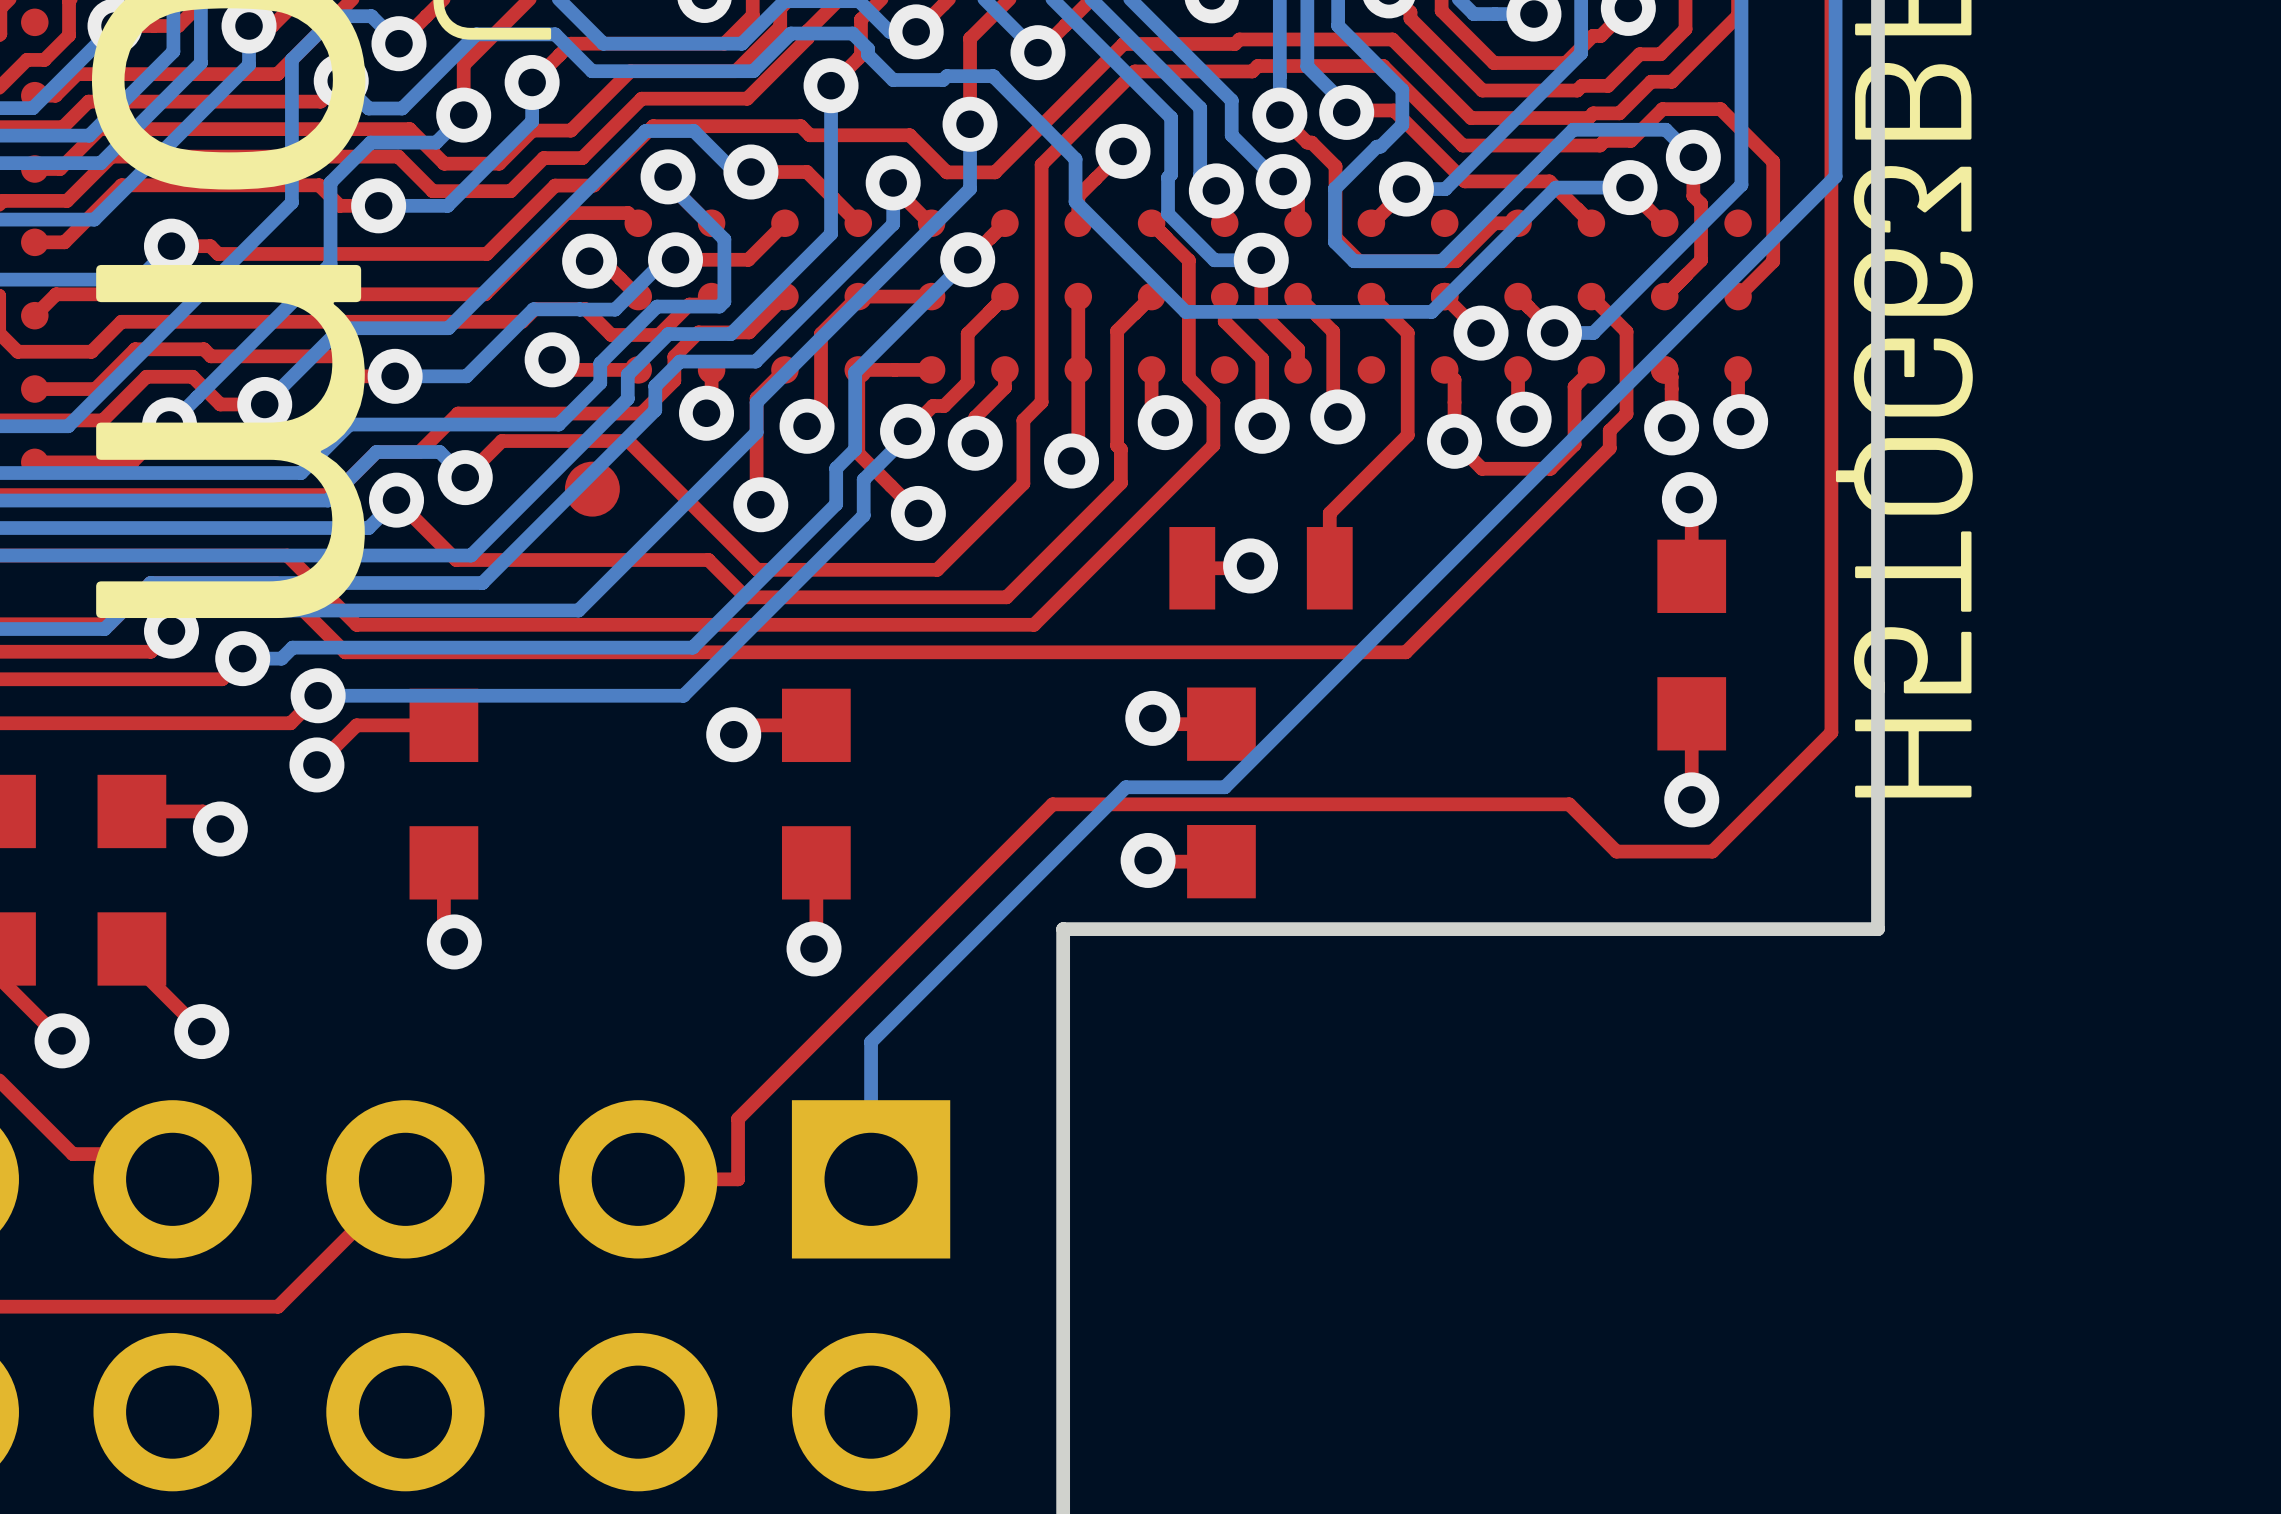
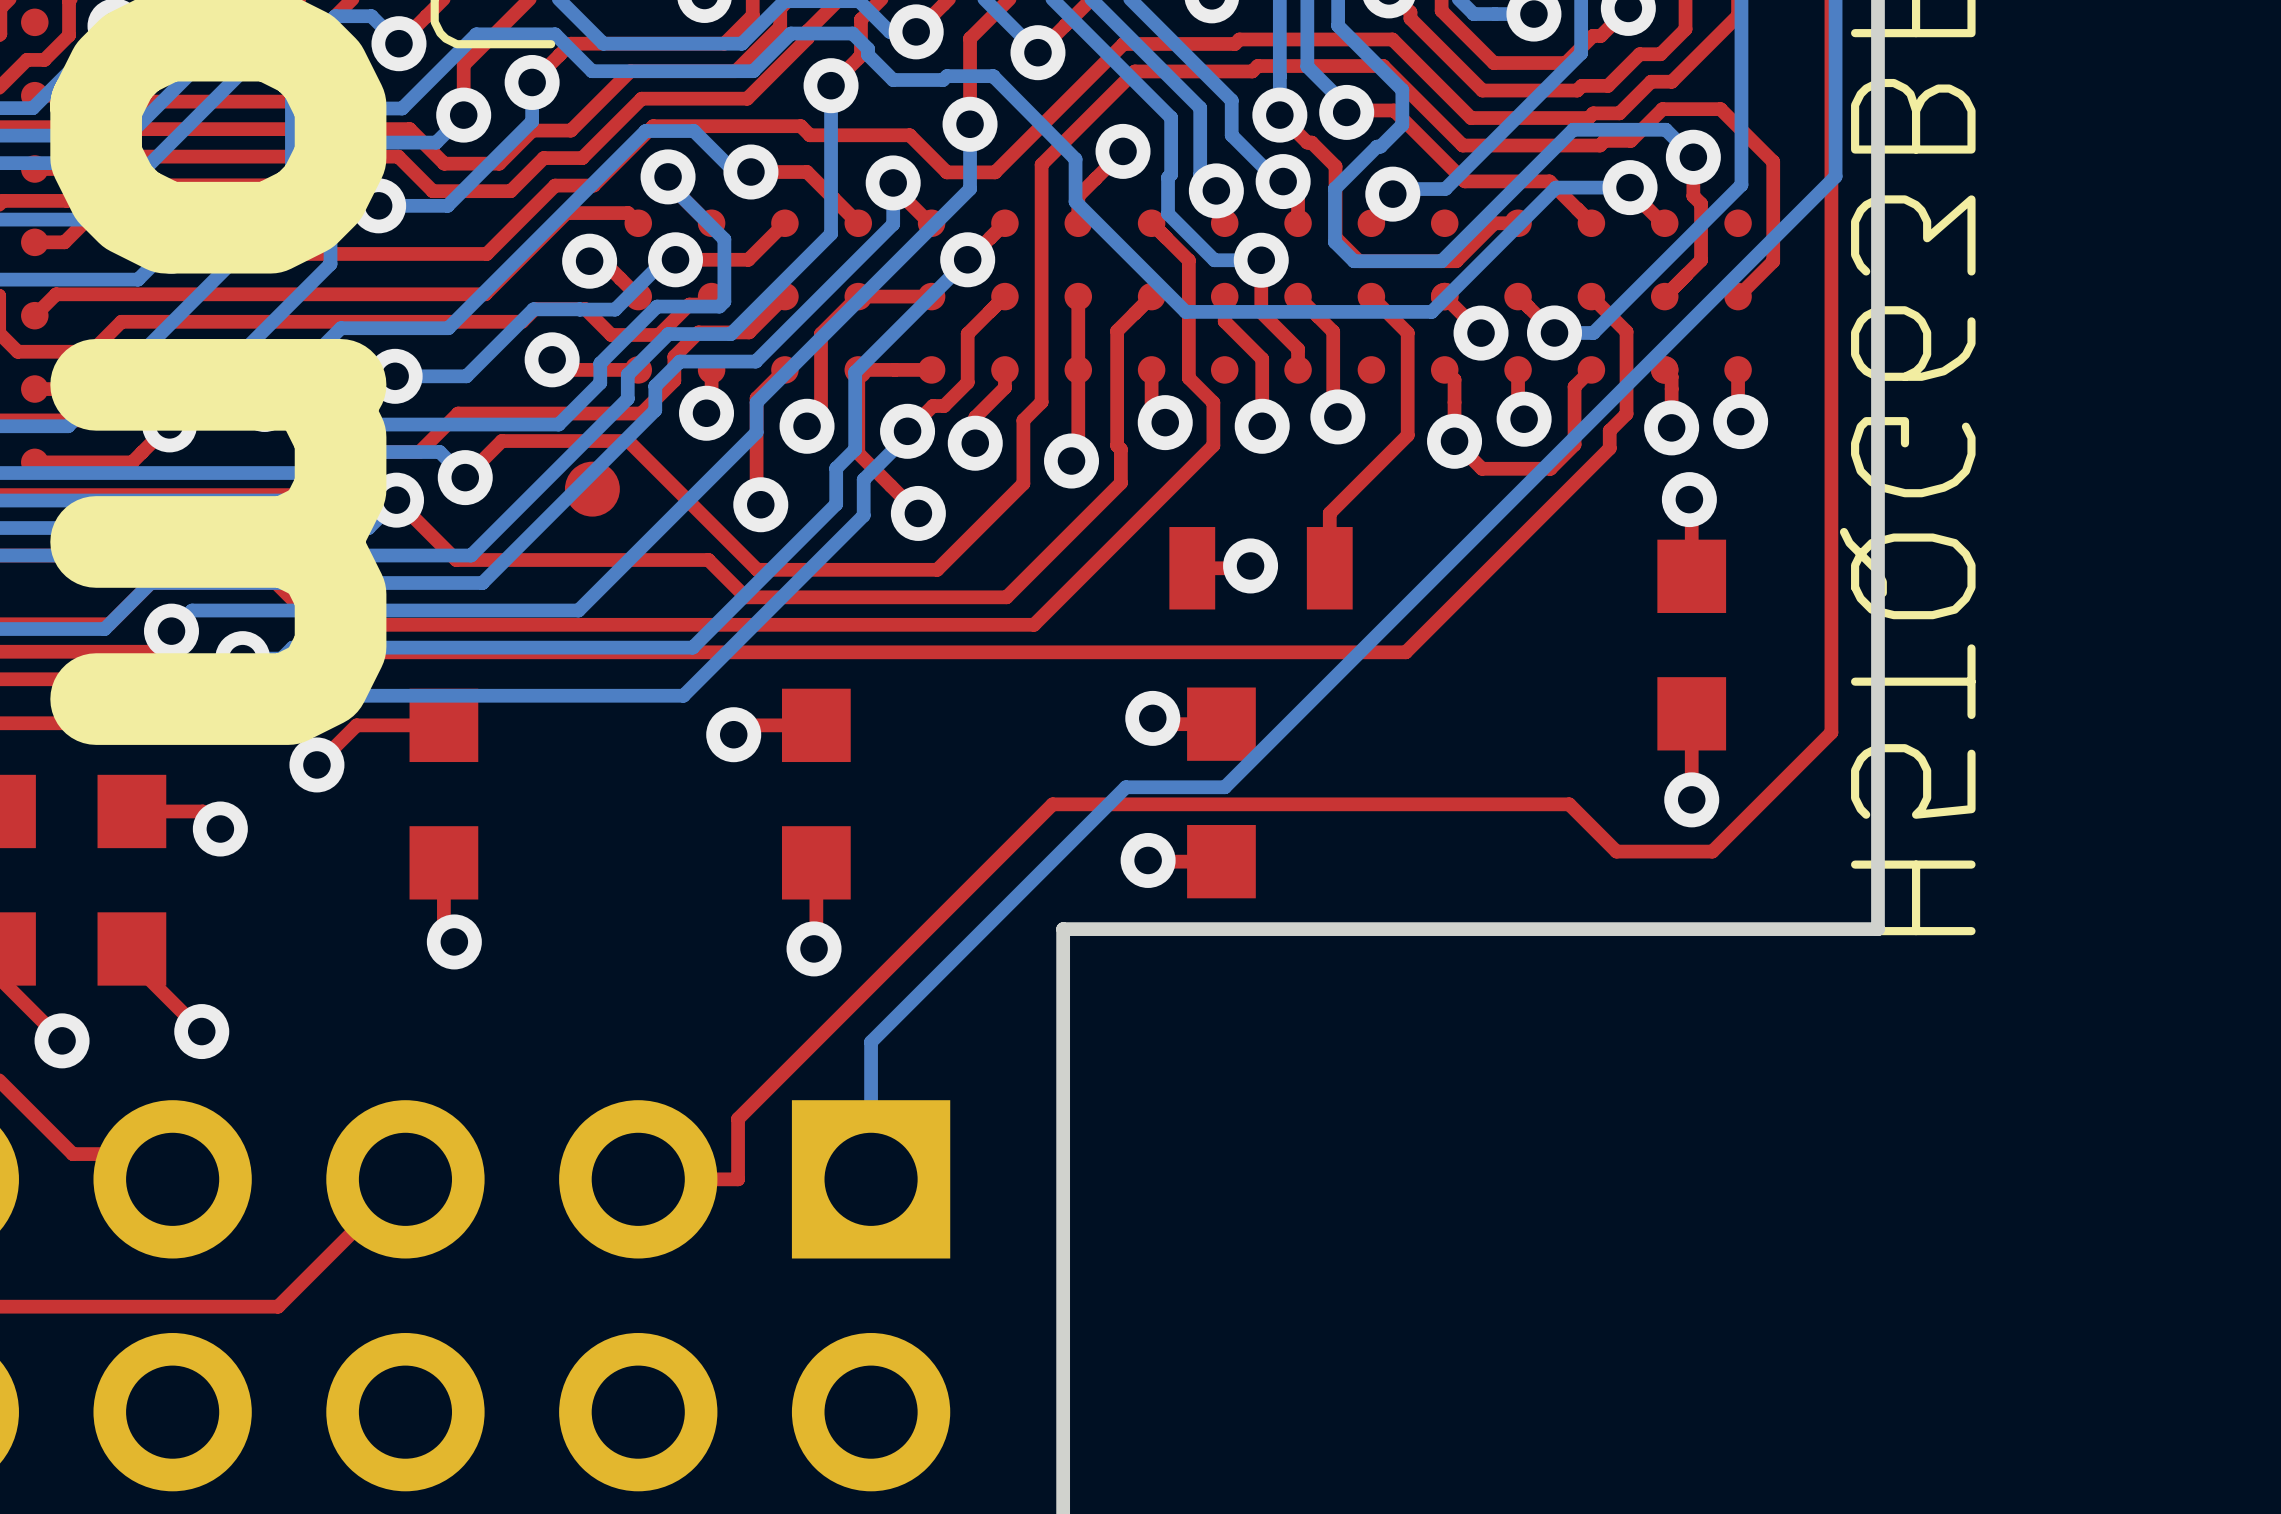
via position: (1406, 189) -> (1392, 194)

